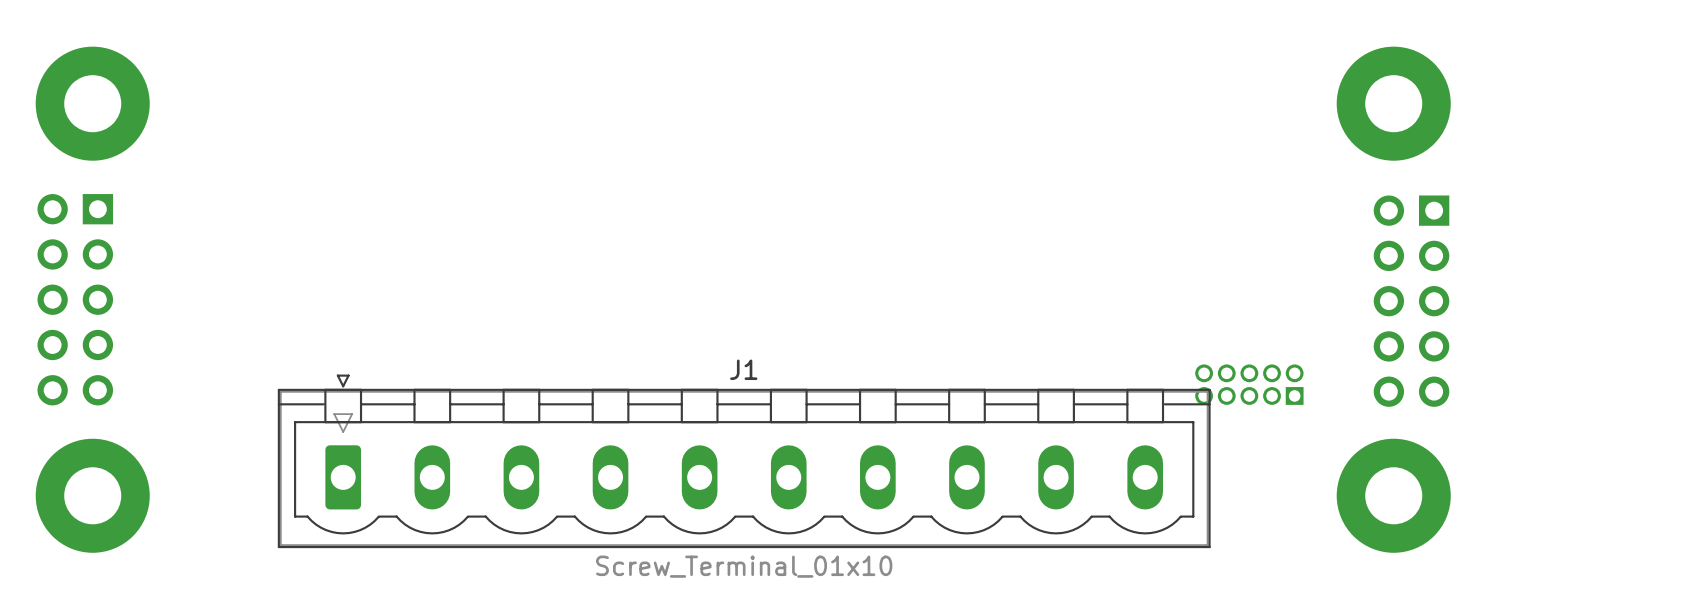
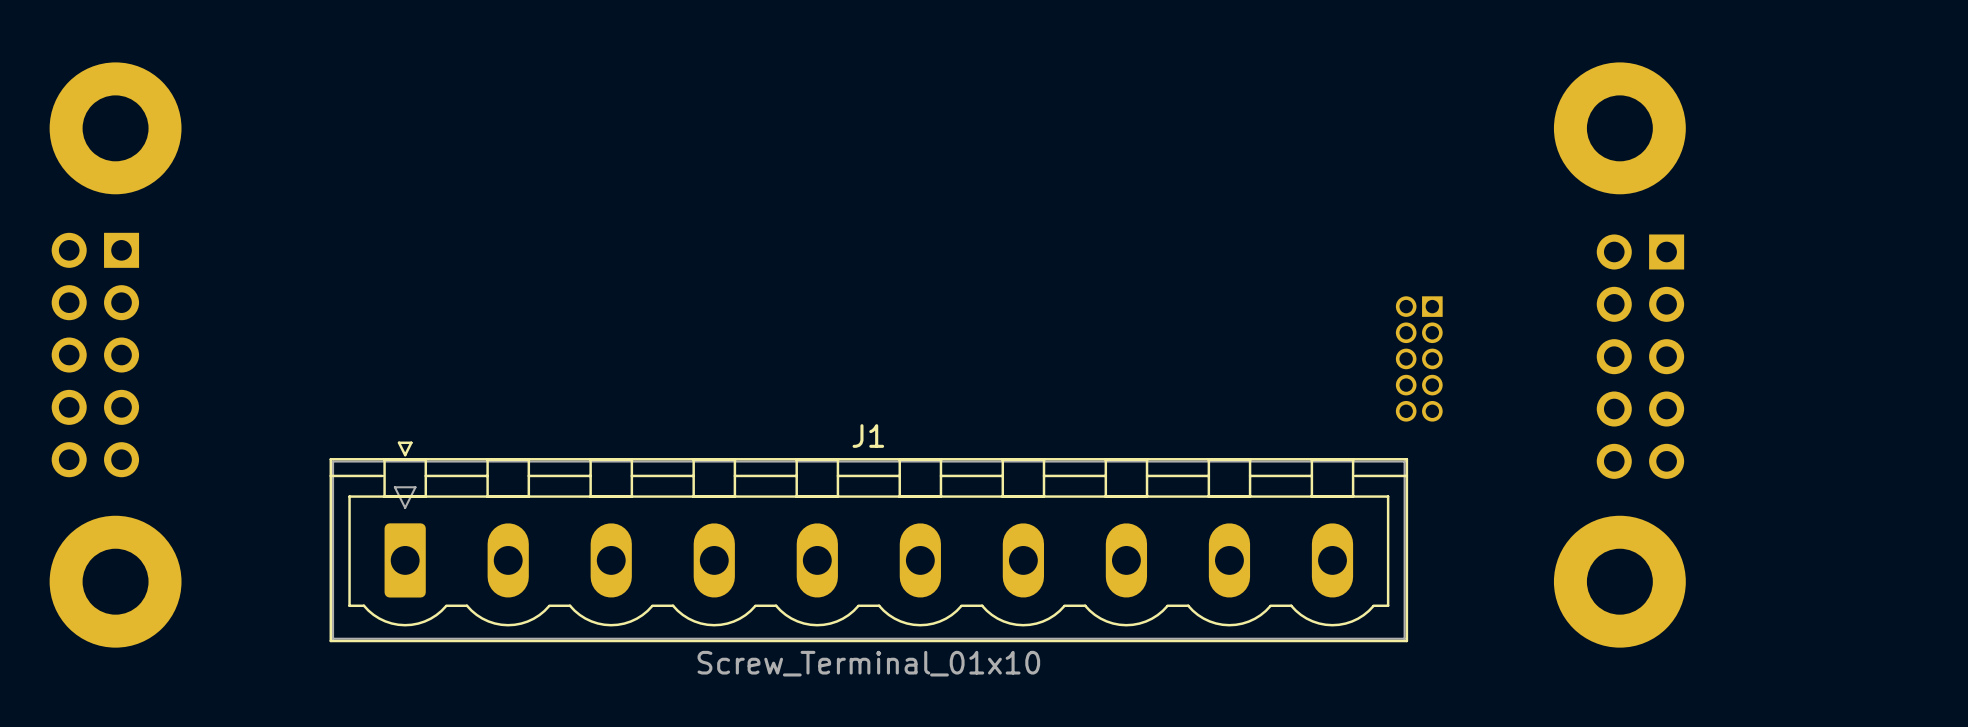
part rotation: 0° (1249, 384) -> 90° counterclockwise (1419, 358)
part position: (1249, 384) -> (1419, 358)

